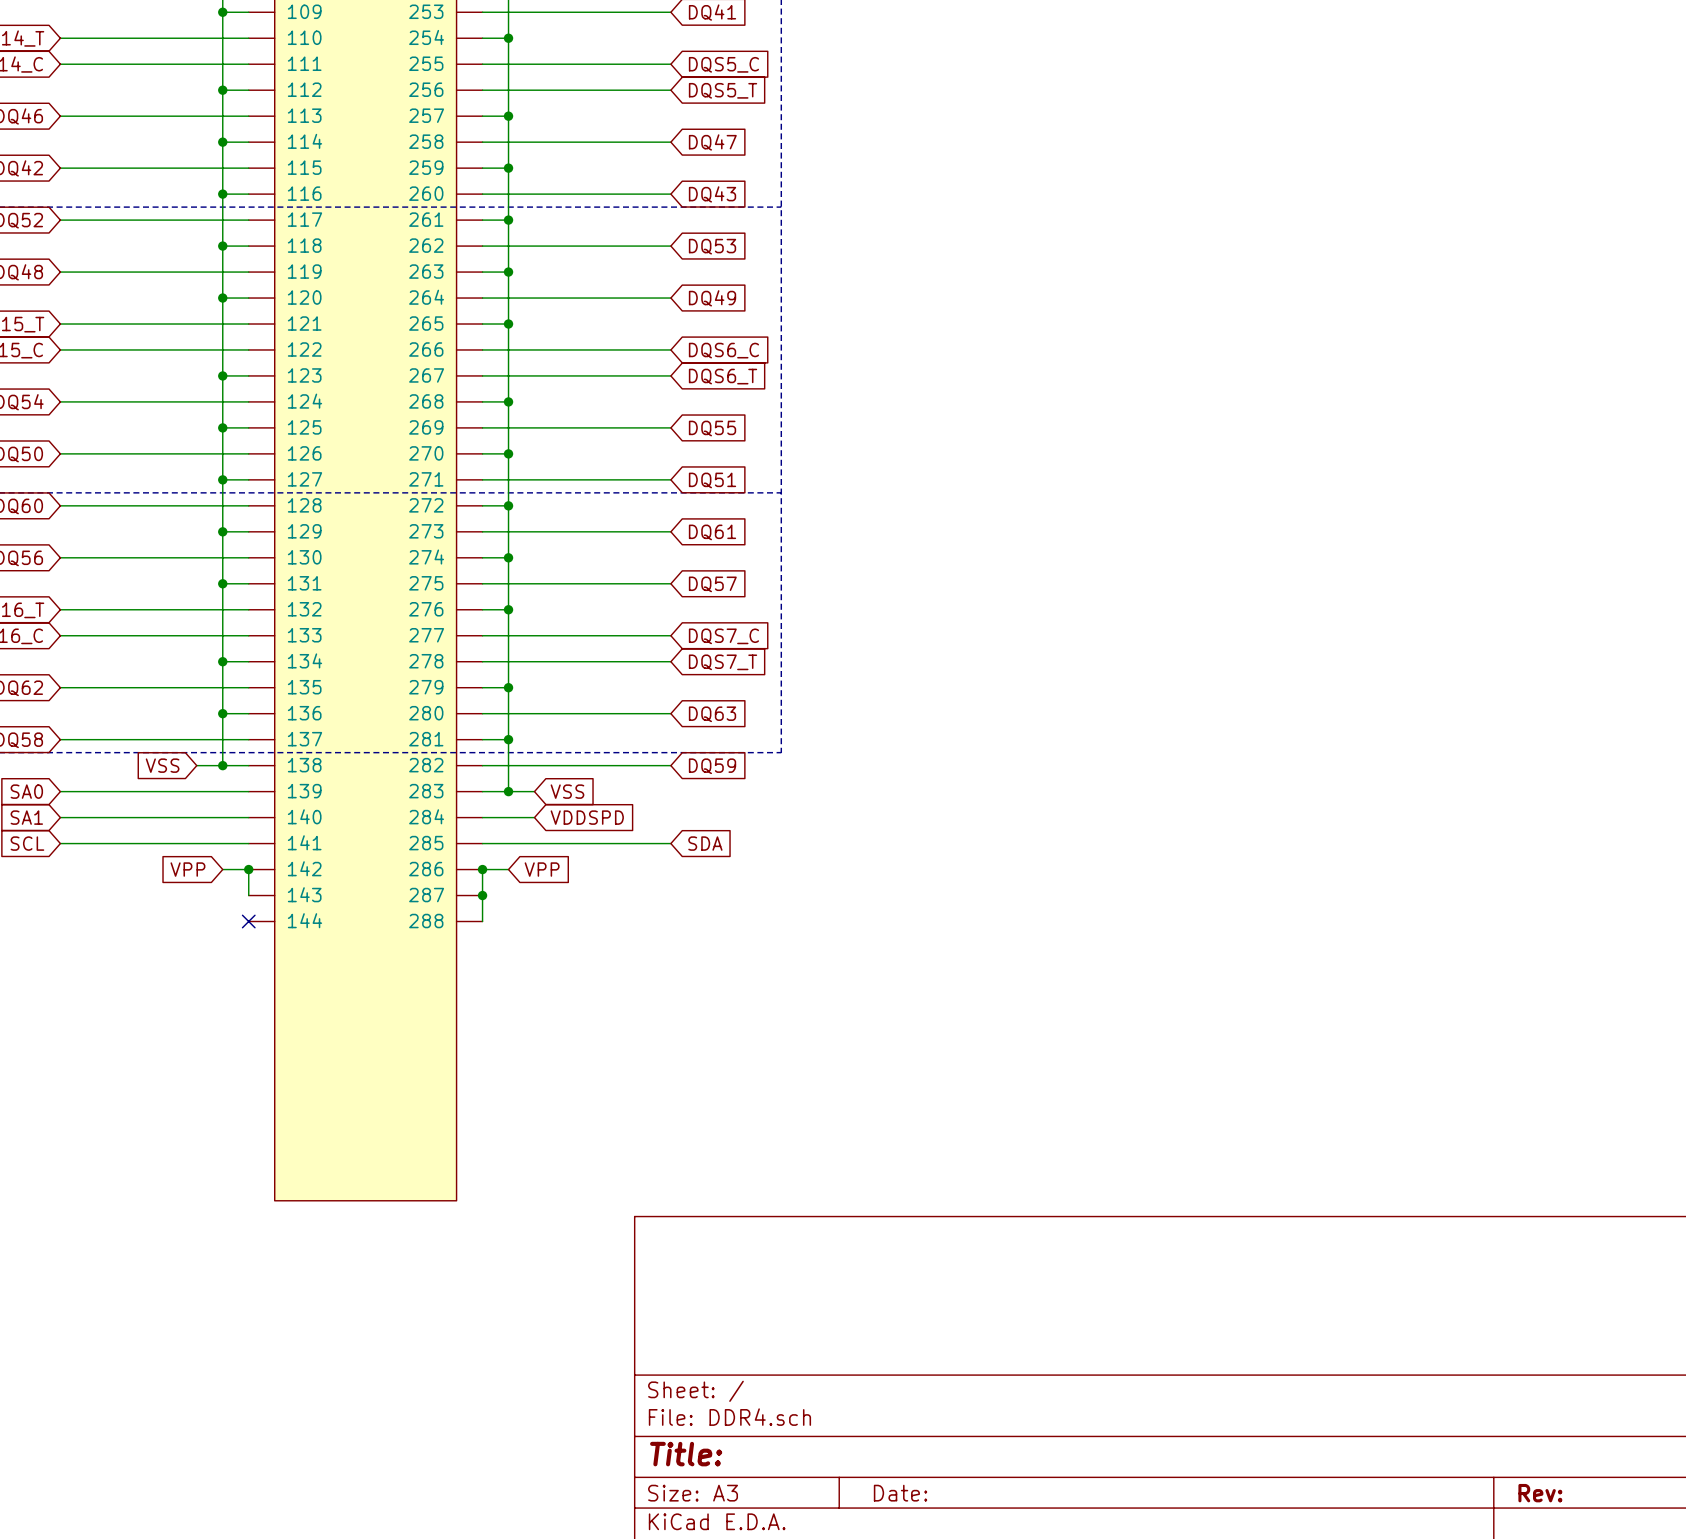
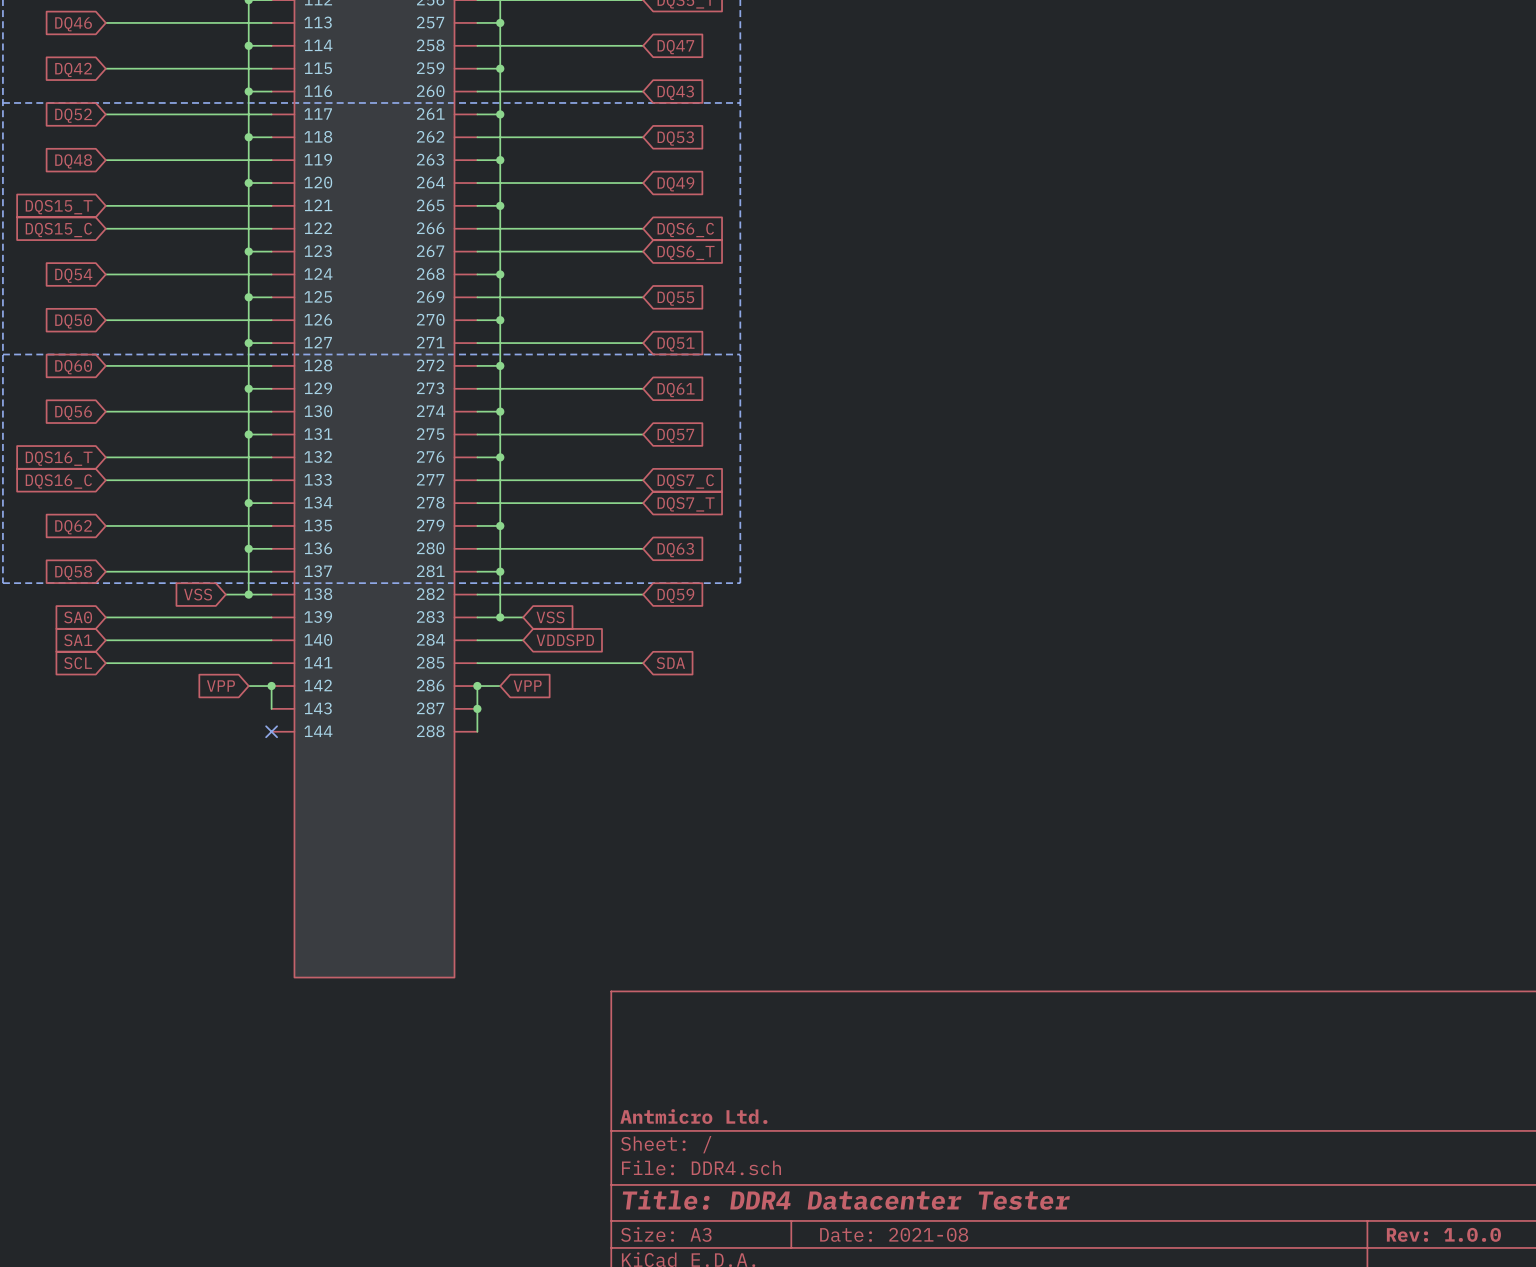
title block: none -> Antmicro Ltd. (693, 1116)
title block: Title: (686, 1454) -> Title: DDR4 Datacenter Tester (846, 1199)
title block: Date: (900, 1493) -> Date: 2021-08 (894, 1234)
title block: Rev: (1540, 1493) -> Rev: 1.0.0 (1443, 1234)

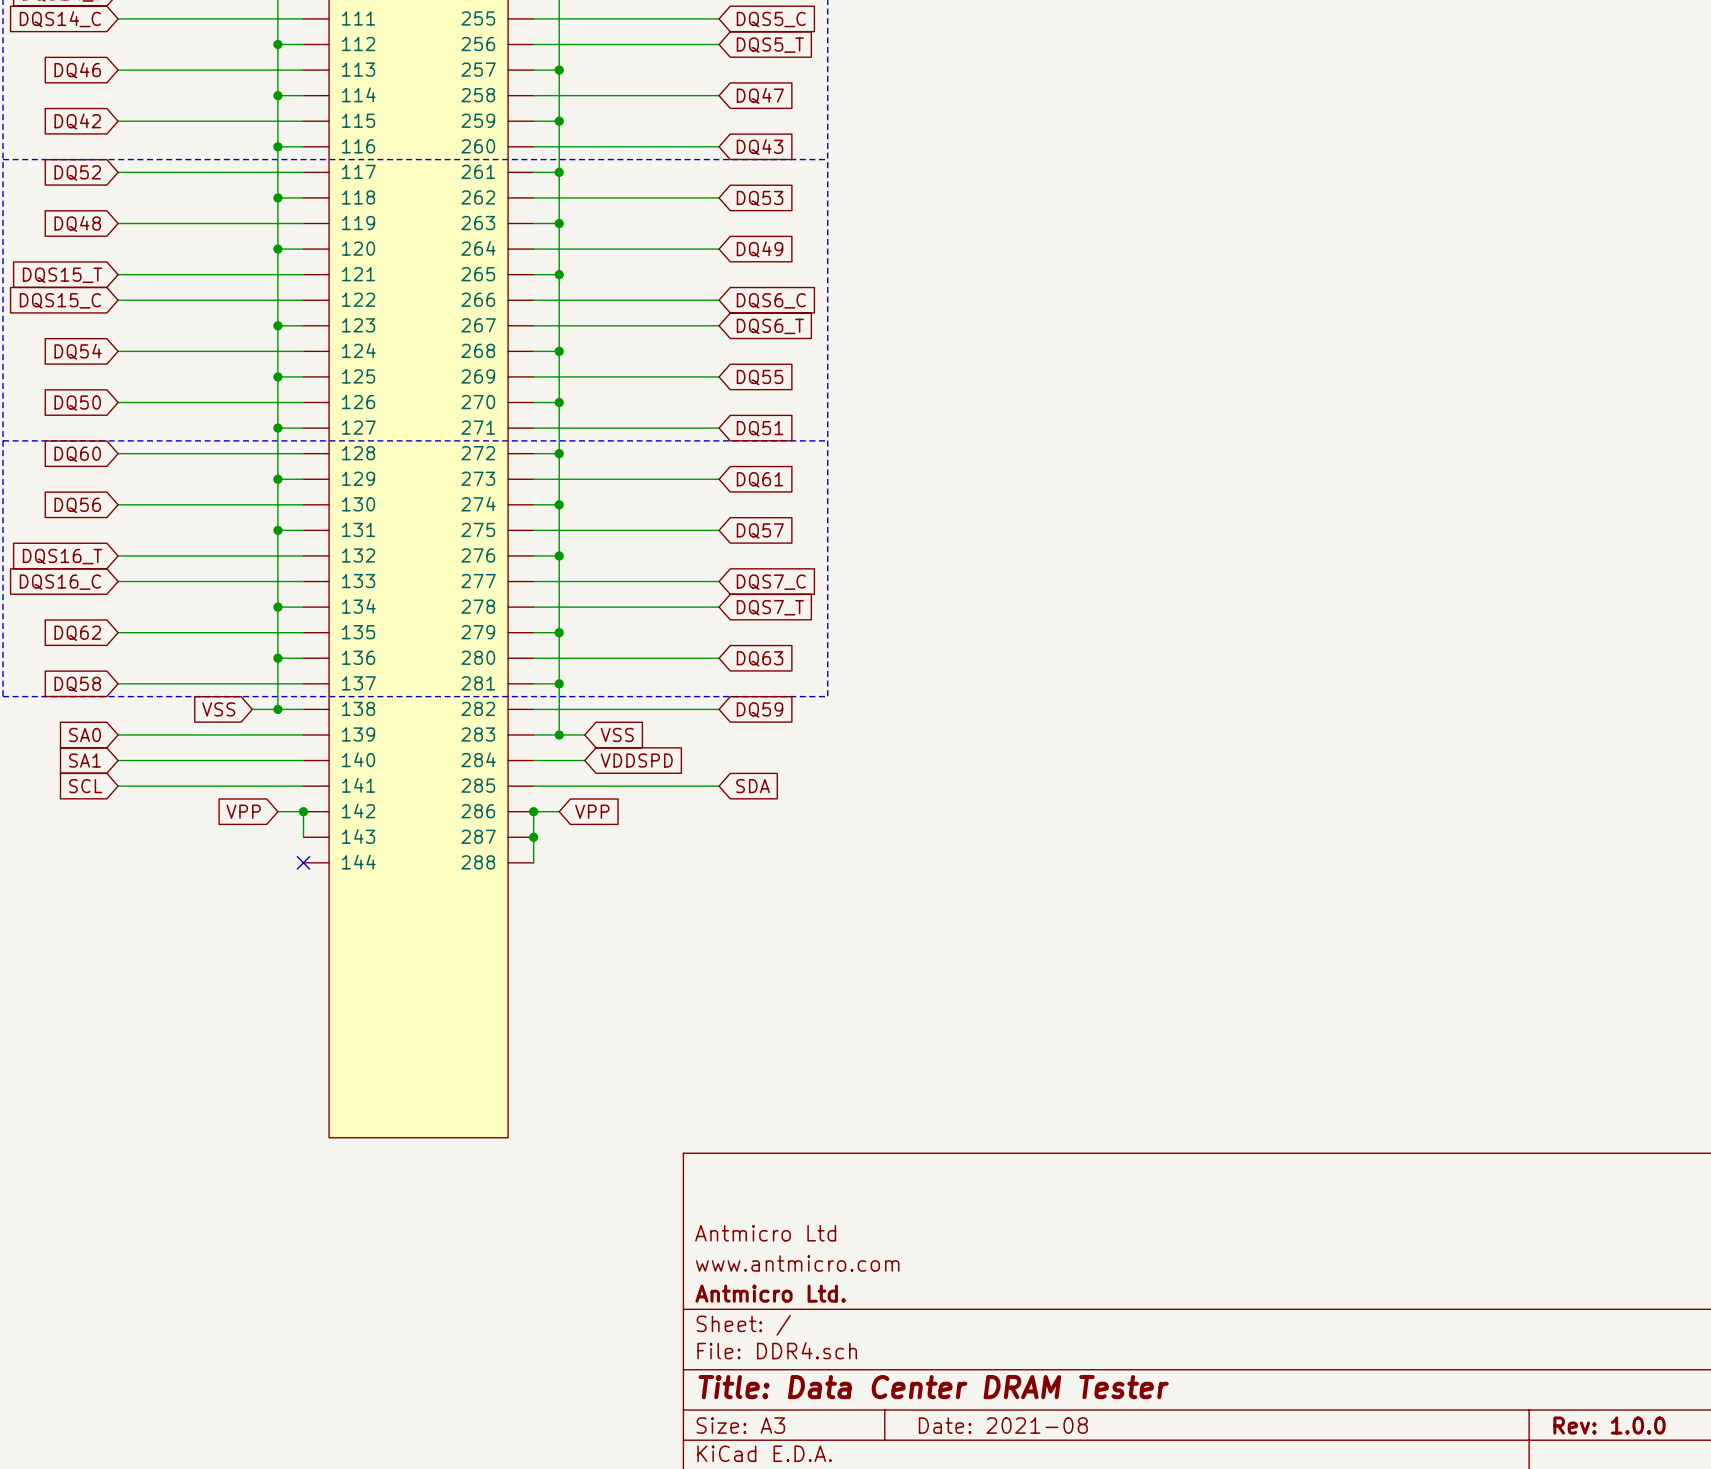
title block: none -> Antmicro Ltd (765, 1233)
title block: none -> www.antmicro.com (797, 1263)
title block: Title: DDR4 Datacenter Tester (846, 1199) -> Title: Data Center DRAM Tester (933, 1387)

